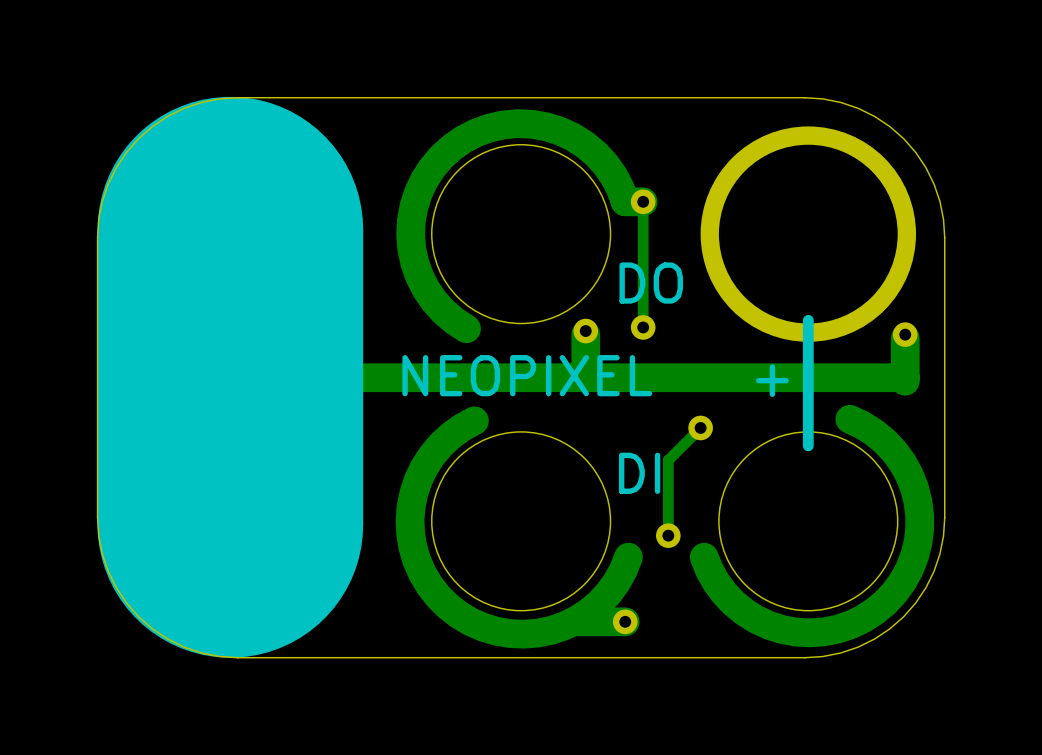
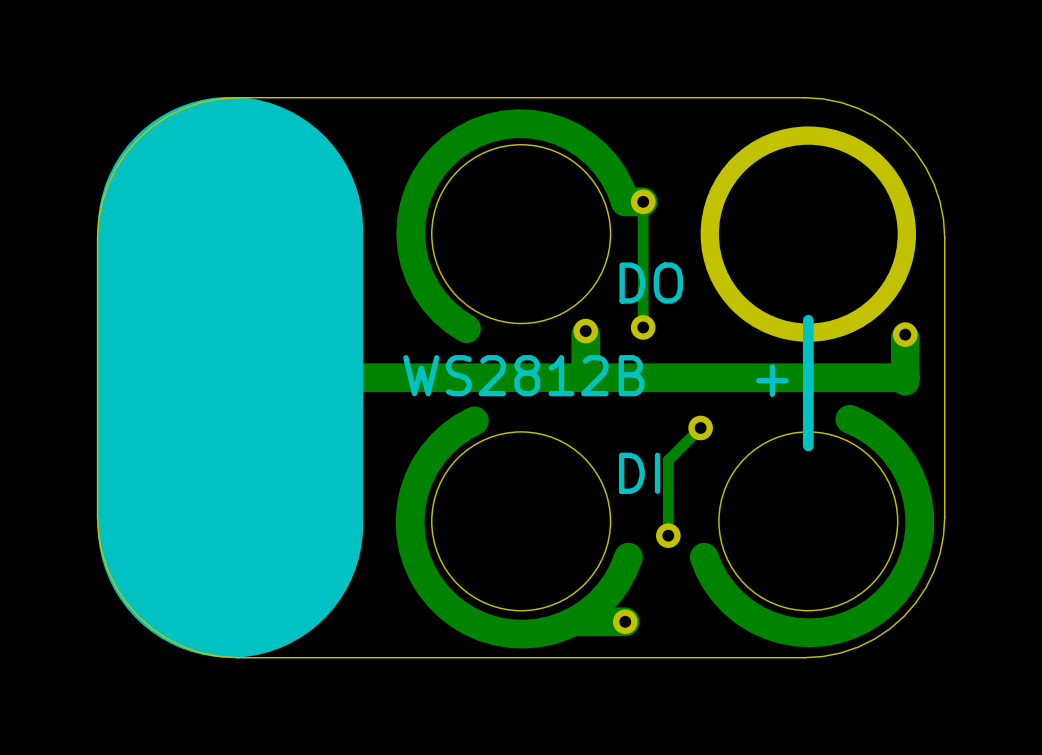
part text: NEOPIXEL (527, 375) -> WS2812B (523, 375)

